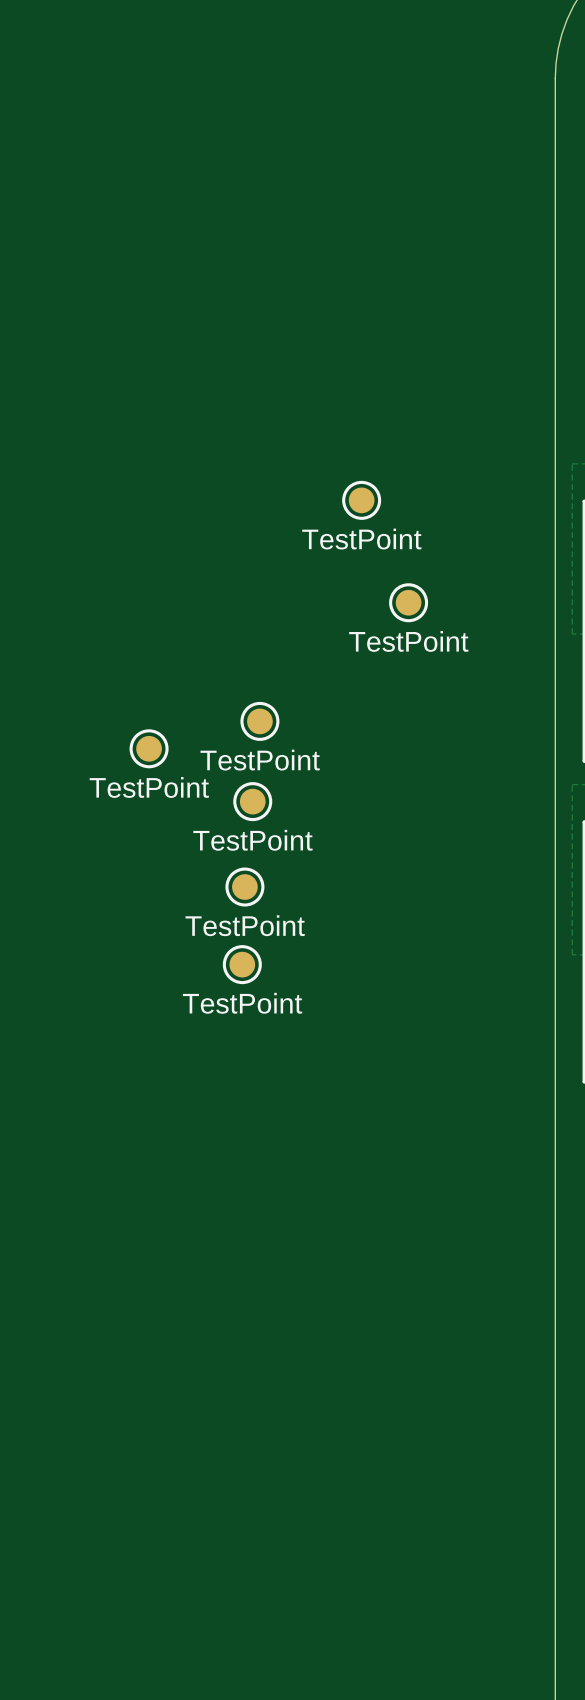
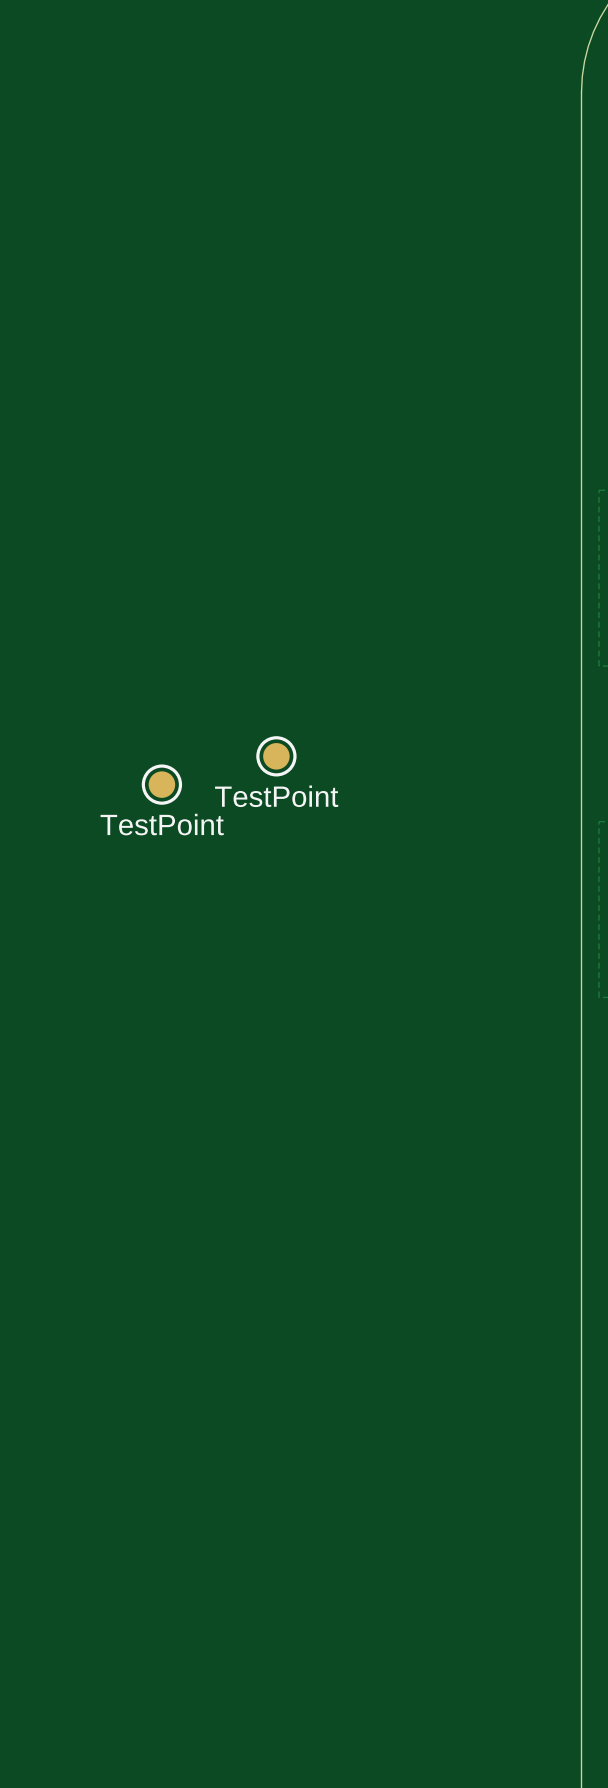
part: TestPoint (361, 500) -> none
part: TestPoint (408, 602) -> none
part: TestPoint (252, 801) -> none
part: TestPoint (244, 887) -> none
part: TestPoint (242, 964) -> none

